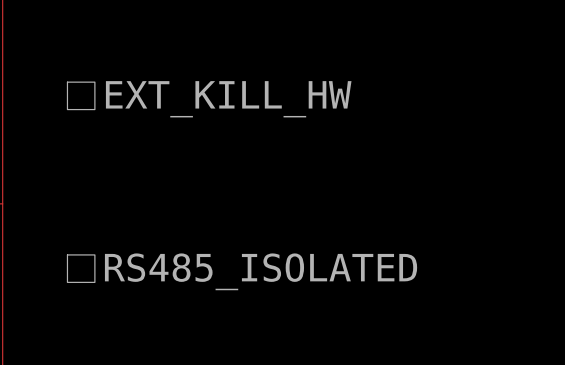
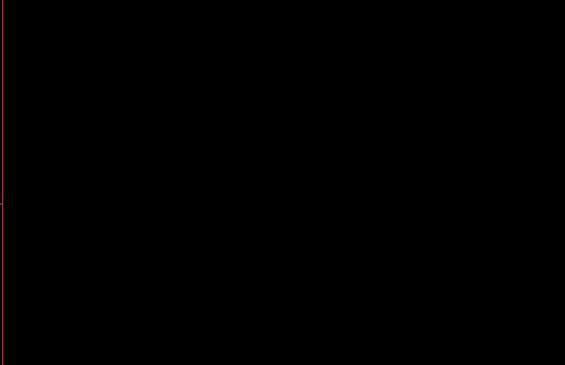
hierarchical label: EXT_KILL_HW (228, 99) -> none
hierarchical label: RS485_ISOLATED (261, 271) -> none

